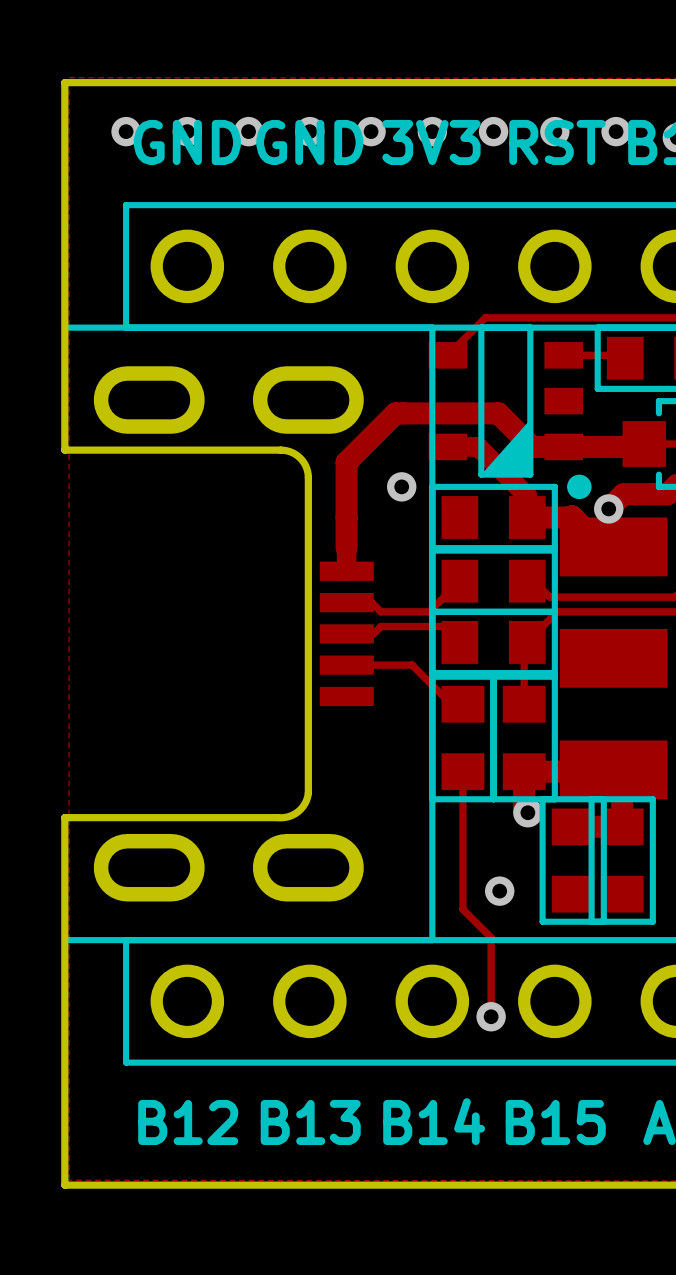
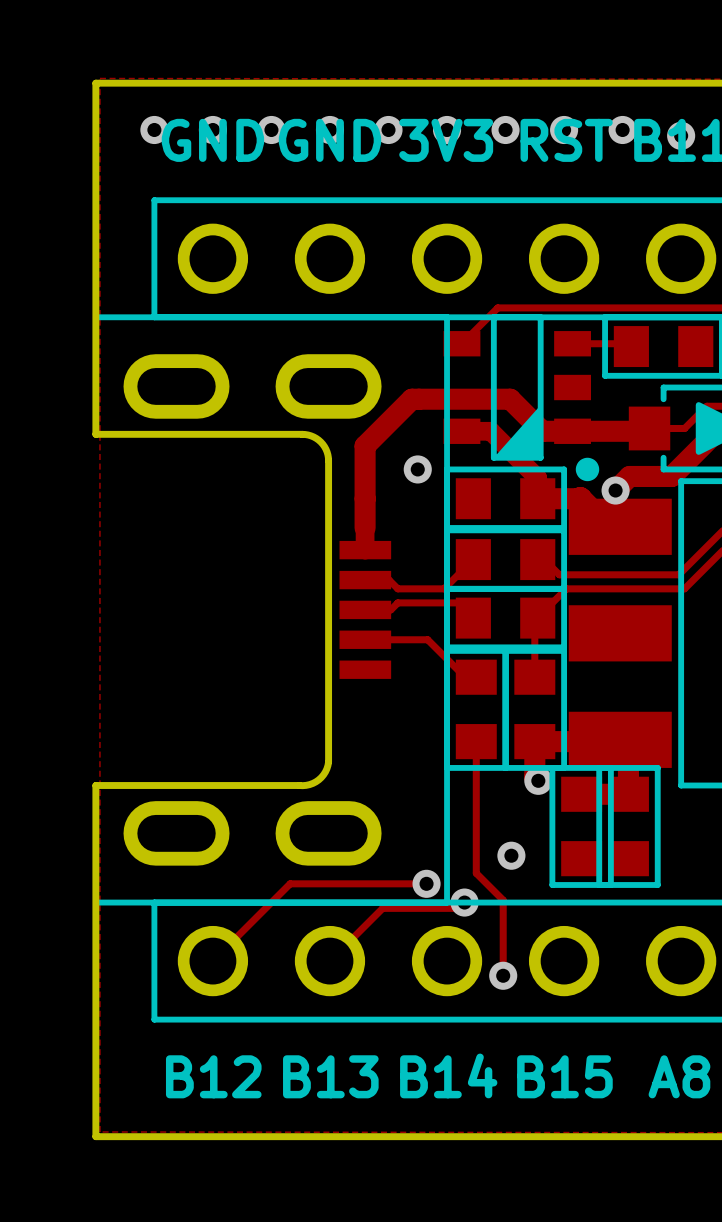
track: none -> (426, 883) (290, 883) (212, 961)
via: none -> (426, 883)
track: none -> (464, 902) (458, 908) (382, 908) (329, 961)
via: none -> (464, 902)

